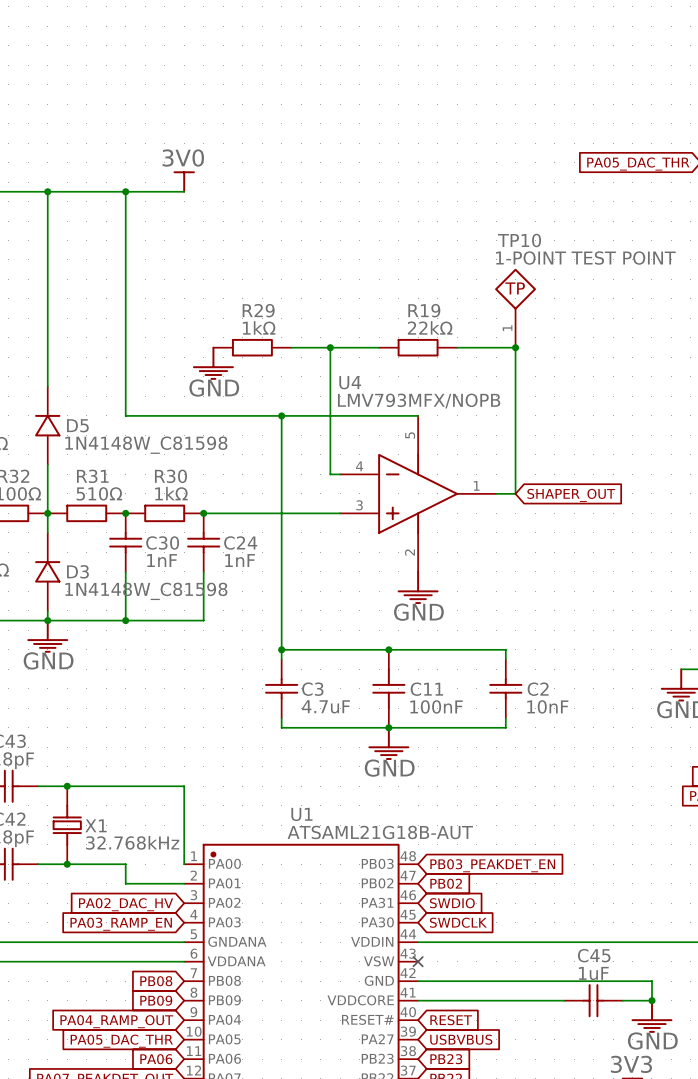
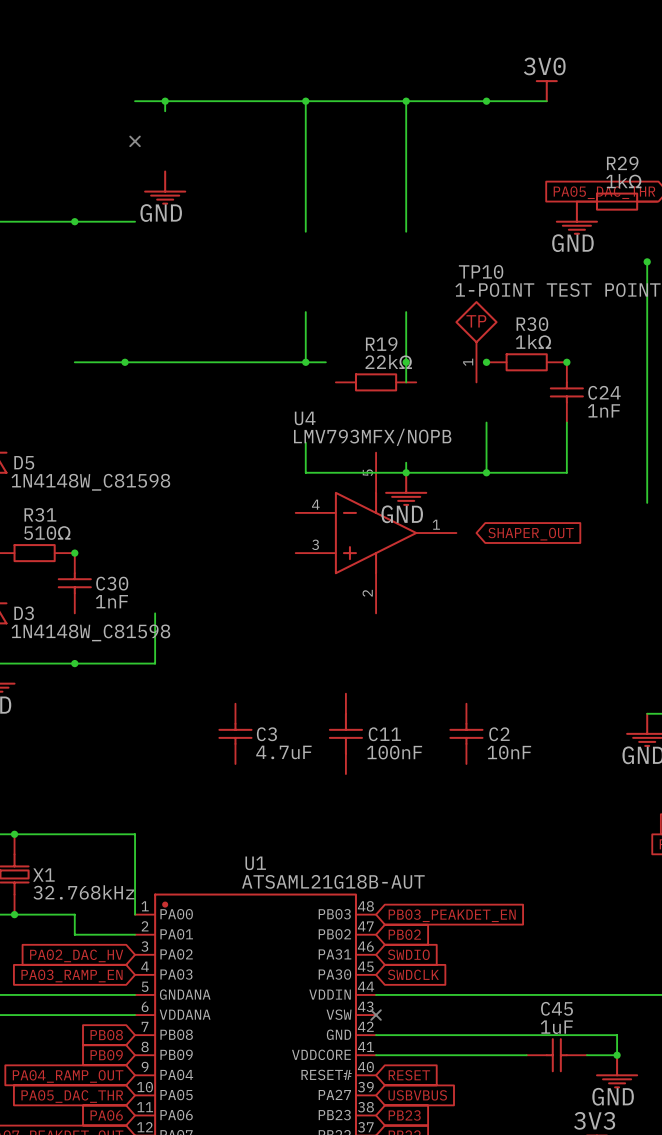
power symbol: none -> 3V0 (546, 91)
wire: none -> (135, 101) (546, 101)
wire: none -> (165, 101) (165, 111)
junction: none -> (165, 101)
wire: none -> (305, 101) (305, 231)
junction: none -> (305, 101)
wire: none -> (406, 101) (406, 231)
junction: none -> (406, 101)
junction: none -> (486, 101)
no-connect mark: none -> (135, 141)
power symbol: none -> GND (165, 187)
power symbol: 3V0 (184, 182) -> none
power symbol: none -> GND (576, 217)
wire: (125, 191) (125, 415) (418, 415) -> none
wire: none -> (647, 261) (647, 502)
junction: none -> (647, 261)
wire: none -> (305, 312) (305, 362)
wire: none -> (406, 312) (406, 382)
wire: none -> (74, 362) (325, 362)
junction: none -> (125, 362)
junction: none -> (406, 362)
junction: none -> (566, 362)
R29 position: (252, 347) -> (617, 201)
wire: (291, 347) (379, 347) -> none
wire: (330, 347) (330, 474) (340, 474) -> none
junction position: (330, 347) -> (305, 362)
wire: (457, 347) (515, 347) (515, 493) (496, 493) -> none
junction position: (515, 347) -> (486, 362)
power symbol: GND (213, 363) -> none
wire: none -> (486, 422) (486, 472)
wire: none -> (566, 422) (566, 472) (305, 472) (305, 442)
wire: (281, 415) (281, 659) -> none
junction: (281, 415) -> none
wire: none -> (406, 462) (406, 472)
junction: none -> (406, 472)
junction: none -> (486, 472)
power symbol: none -> GND (406, 488)
R30 position: (164, 513) -> (526, 362)
wire: (203, 513) (340, 513) -> none
junction: (203, 513) -> none
C24 position: (203, 542) -> (566, 392)
wire: (125, 571) (125, 620) -> none
power symbol: GND (418, 587) -> none
wire: (281, 649) (505, 649) (505, 659) -> none
junction: (281, 649) -> none
junction: (388, 649) -> none
wire: (281, 718) (281, 727) (505, 727) (505, 718) -> none
junction: (388, 727) -> none
power symbol: GND (388, 743) -> none

